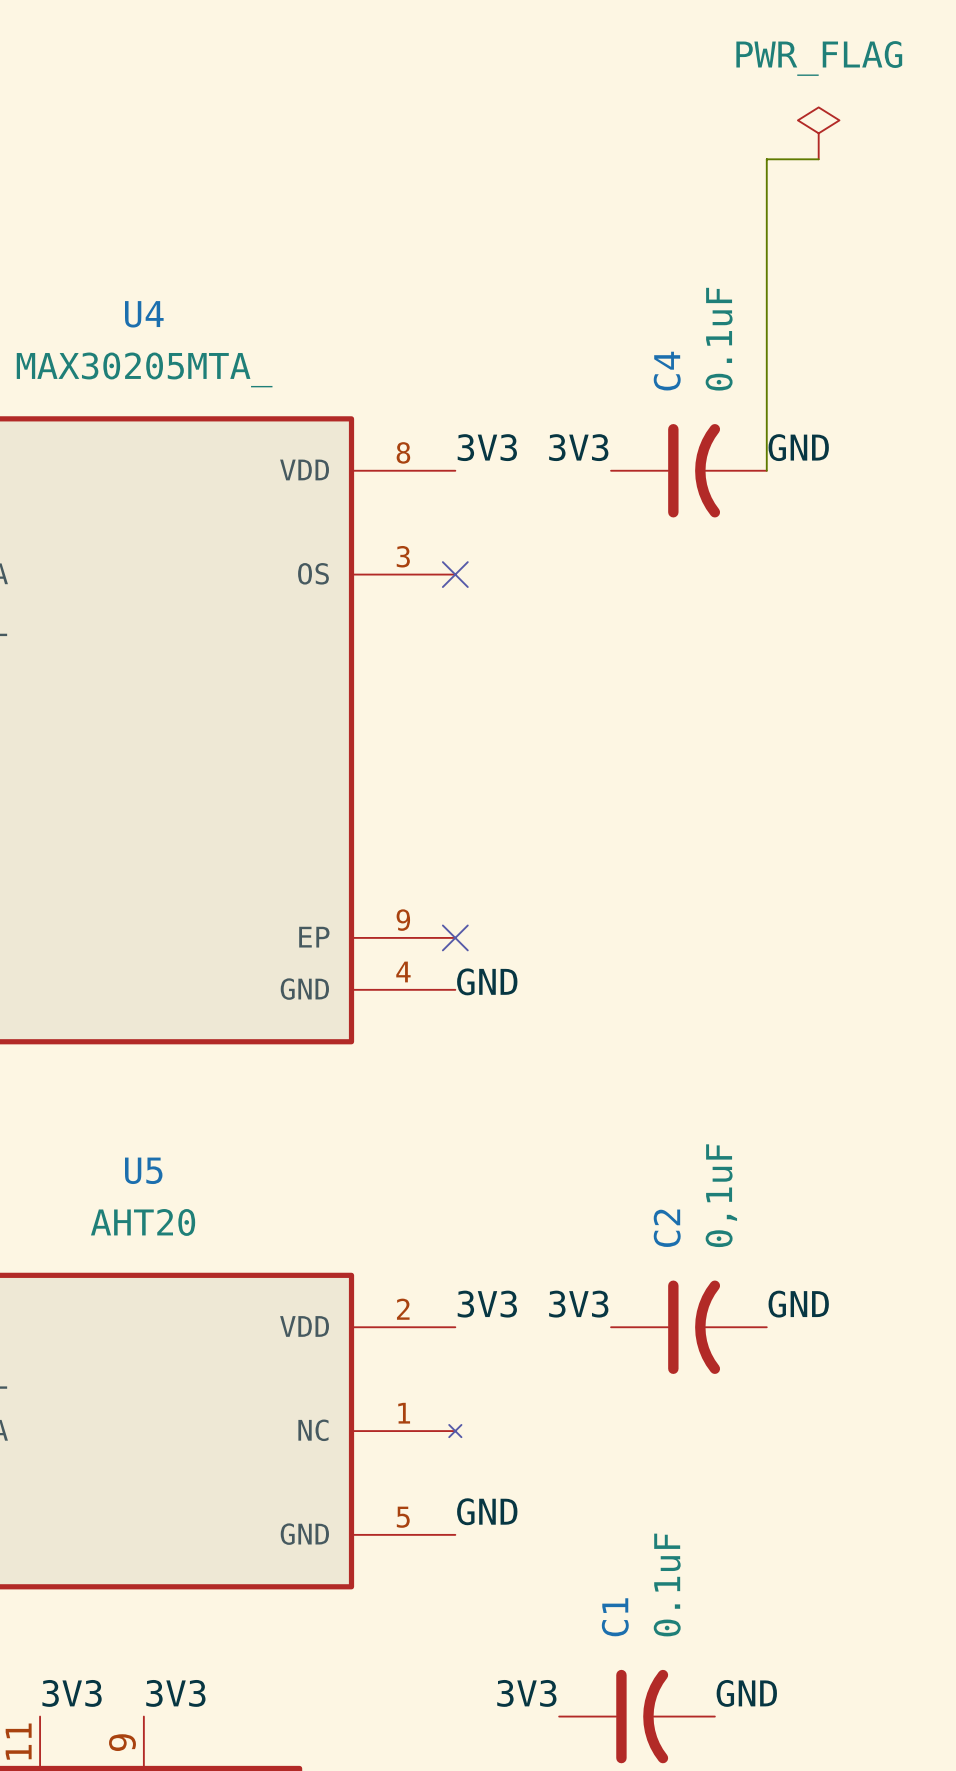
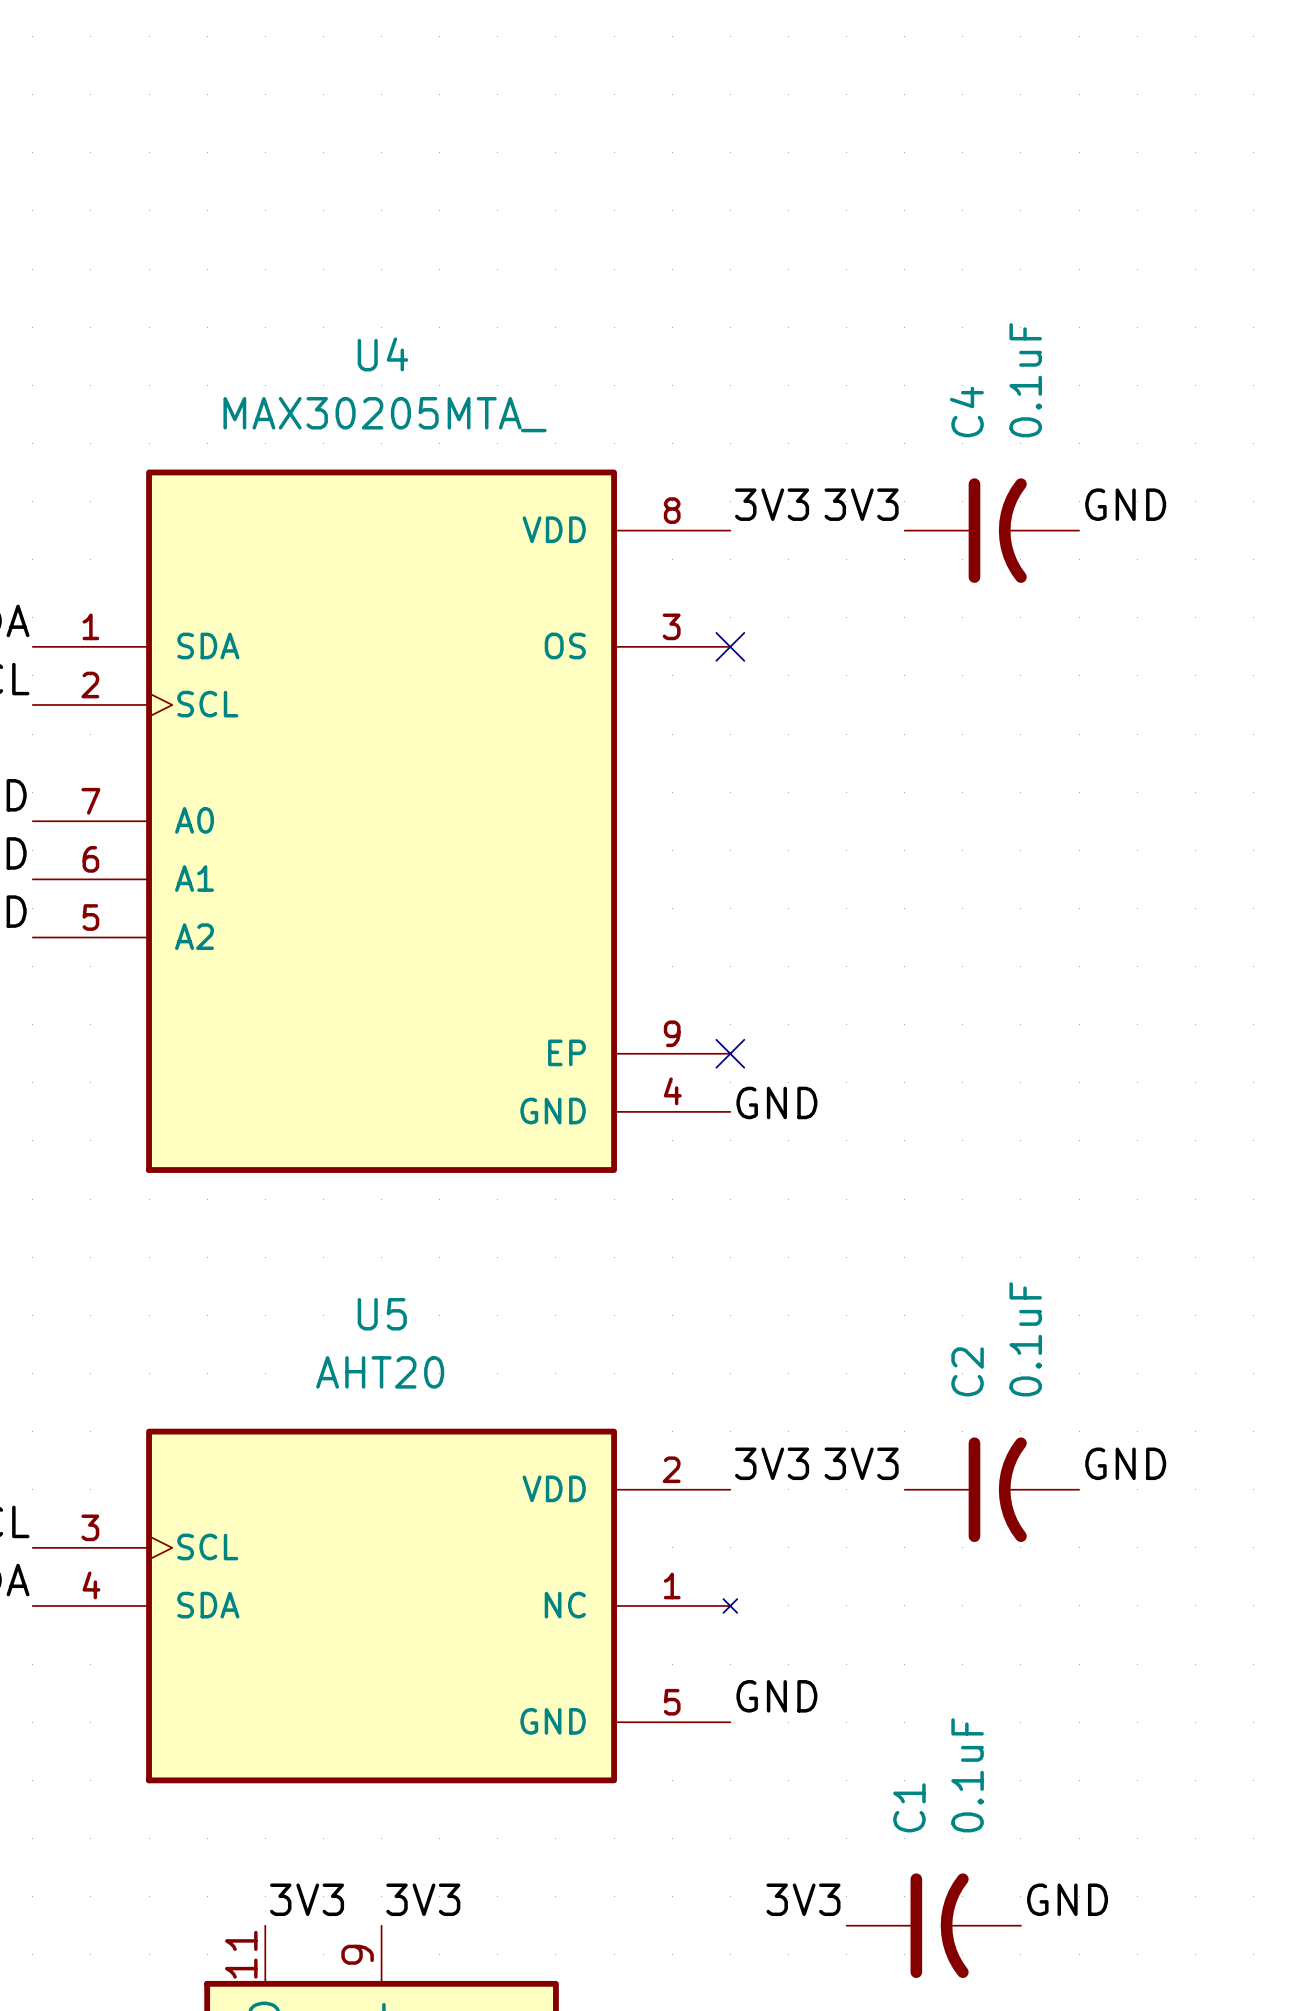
power symbol: PWR_FLAG (818, 133) -> none
wire: (818, 159) (766, 159) (766, 470) -> none
C2 value: 0,1uF (721, 1195) -> 0.1uF (1025, 1339)

